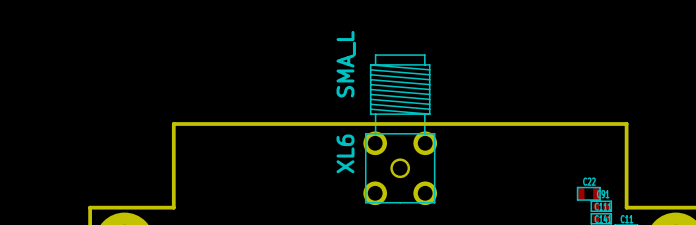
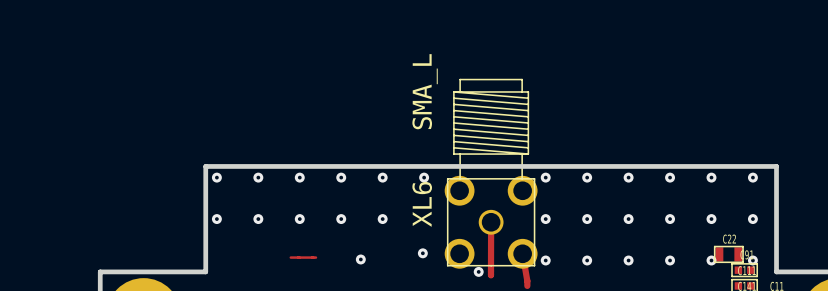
via: none -> (216, 177)
via: none -> (258, 177)
via: none -> (299, 177)
via: none -> (341, 177)
via: none -> (382, 177)
via: none -> (424, 177)
via: none -> (545, 177)
via: none -> (587, 177)
via: none -> (628, 177)
via: none -> (670, 177)
via: none -> (711, 177)
via: none -> (752, 177)
via: none -> (216, 219)
via: none -> (258, 219)
via: none -> (299, 219)
via: none -> (341, 219)
via: none -> (382, 219)
via: none -> (545, 219)
via: none -> (587, 219)
via: none -> (628, 219)
via: none -> (670, 219)
via: none -> (711, 219)
via: none -> (752, 219)
top track: none -> (491, 222) (491, 275)
via: none -> (422, 253)
top track: none -> (522, 253) (527, 285)
top track: none -> (290, 257) (315, 257)
via: none -> (360, 259)
via: none -> (545, 260)
via: none -> (587, 260)
via: none -> (628, 260)
via: none -> (670, 260)
via: none -> (711, 260)
via: none -> (752, 260)
via: none -> (478, 271)

